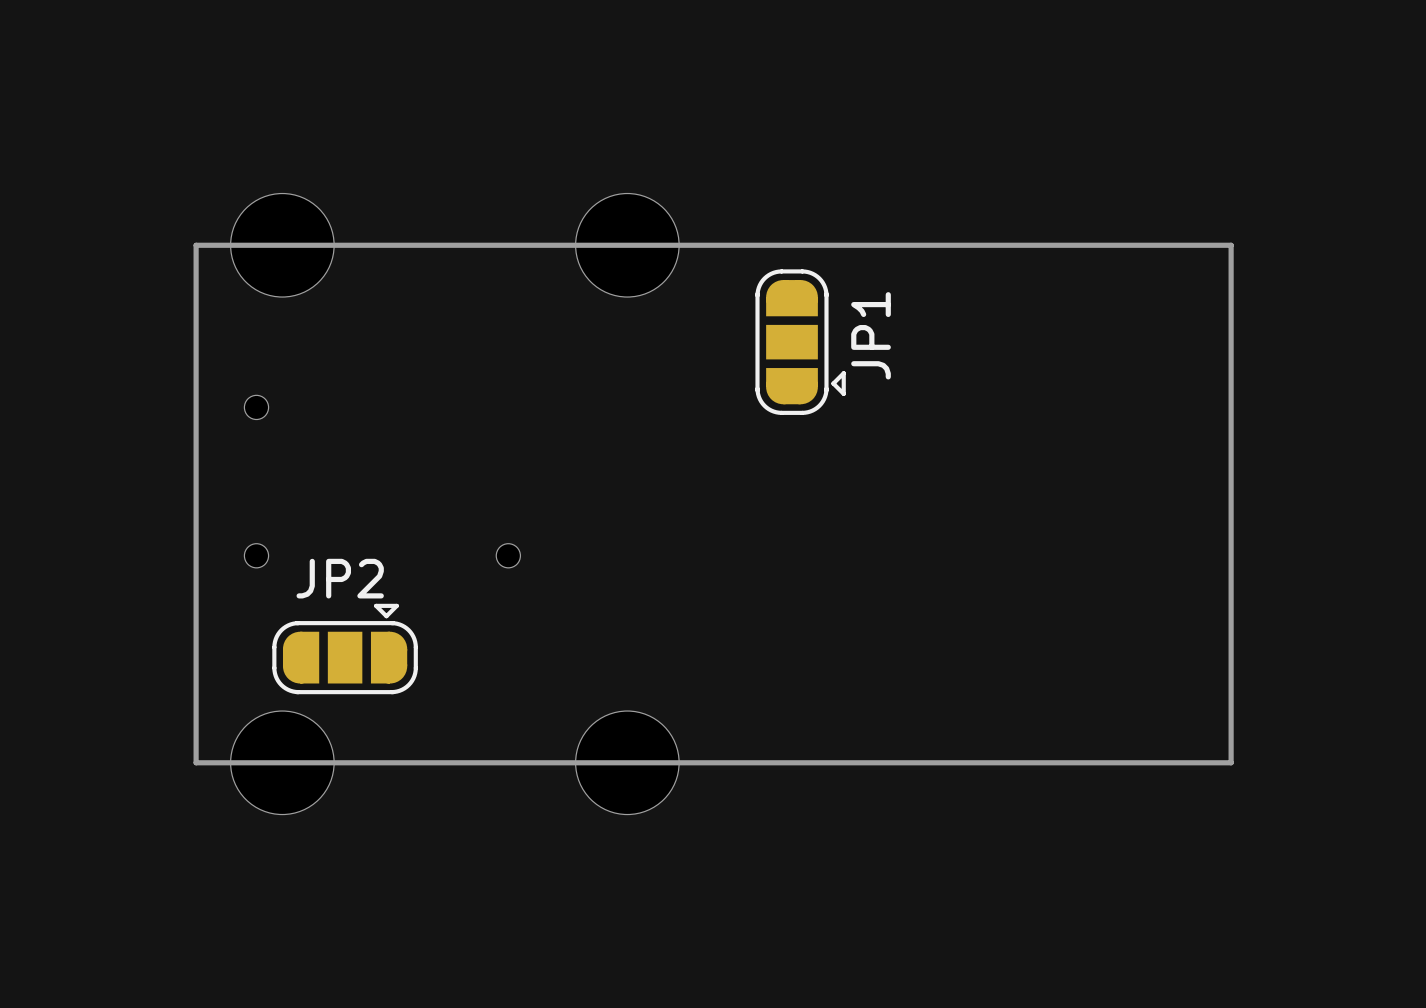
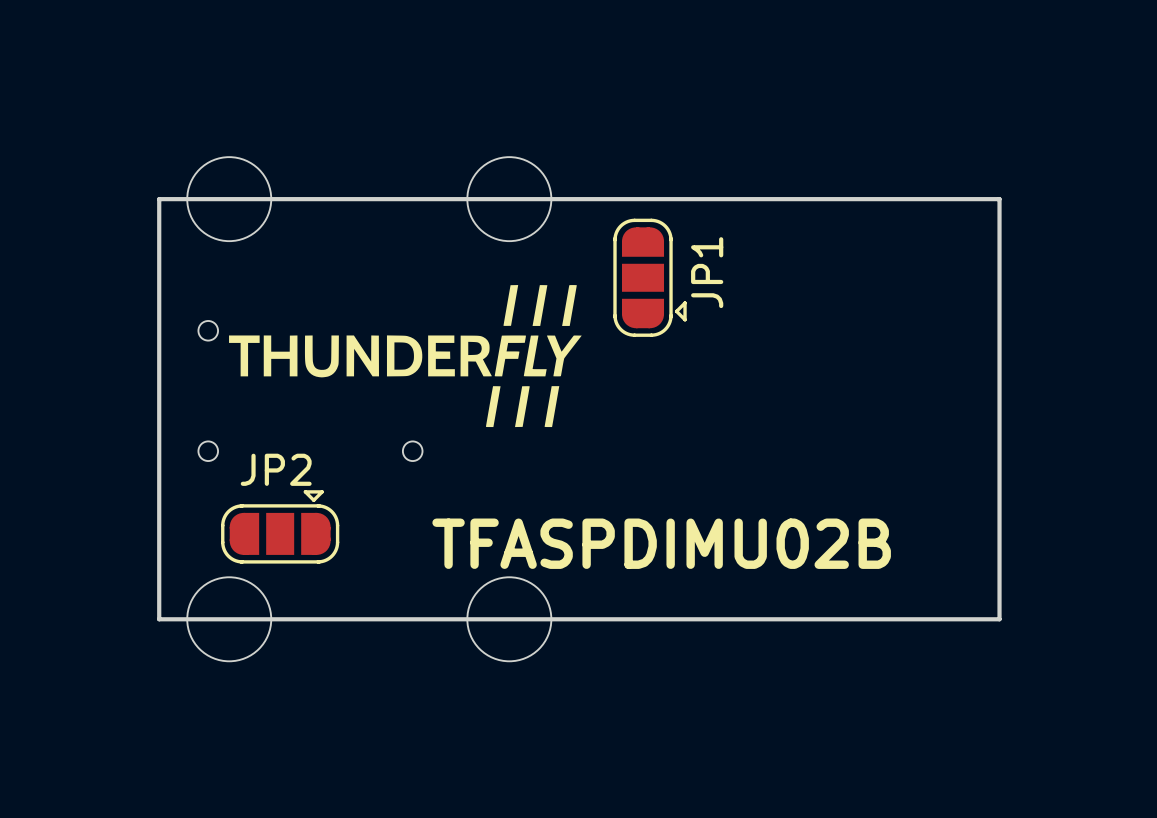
drawing: none -> [229, 285, 582, 428]
text: none -> TFASPDIMU02B (661, 543)

